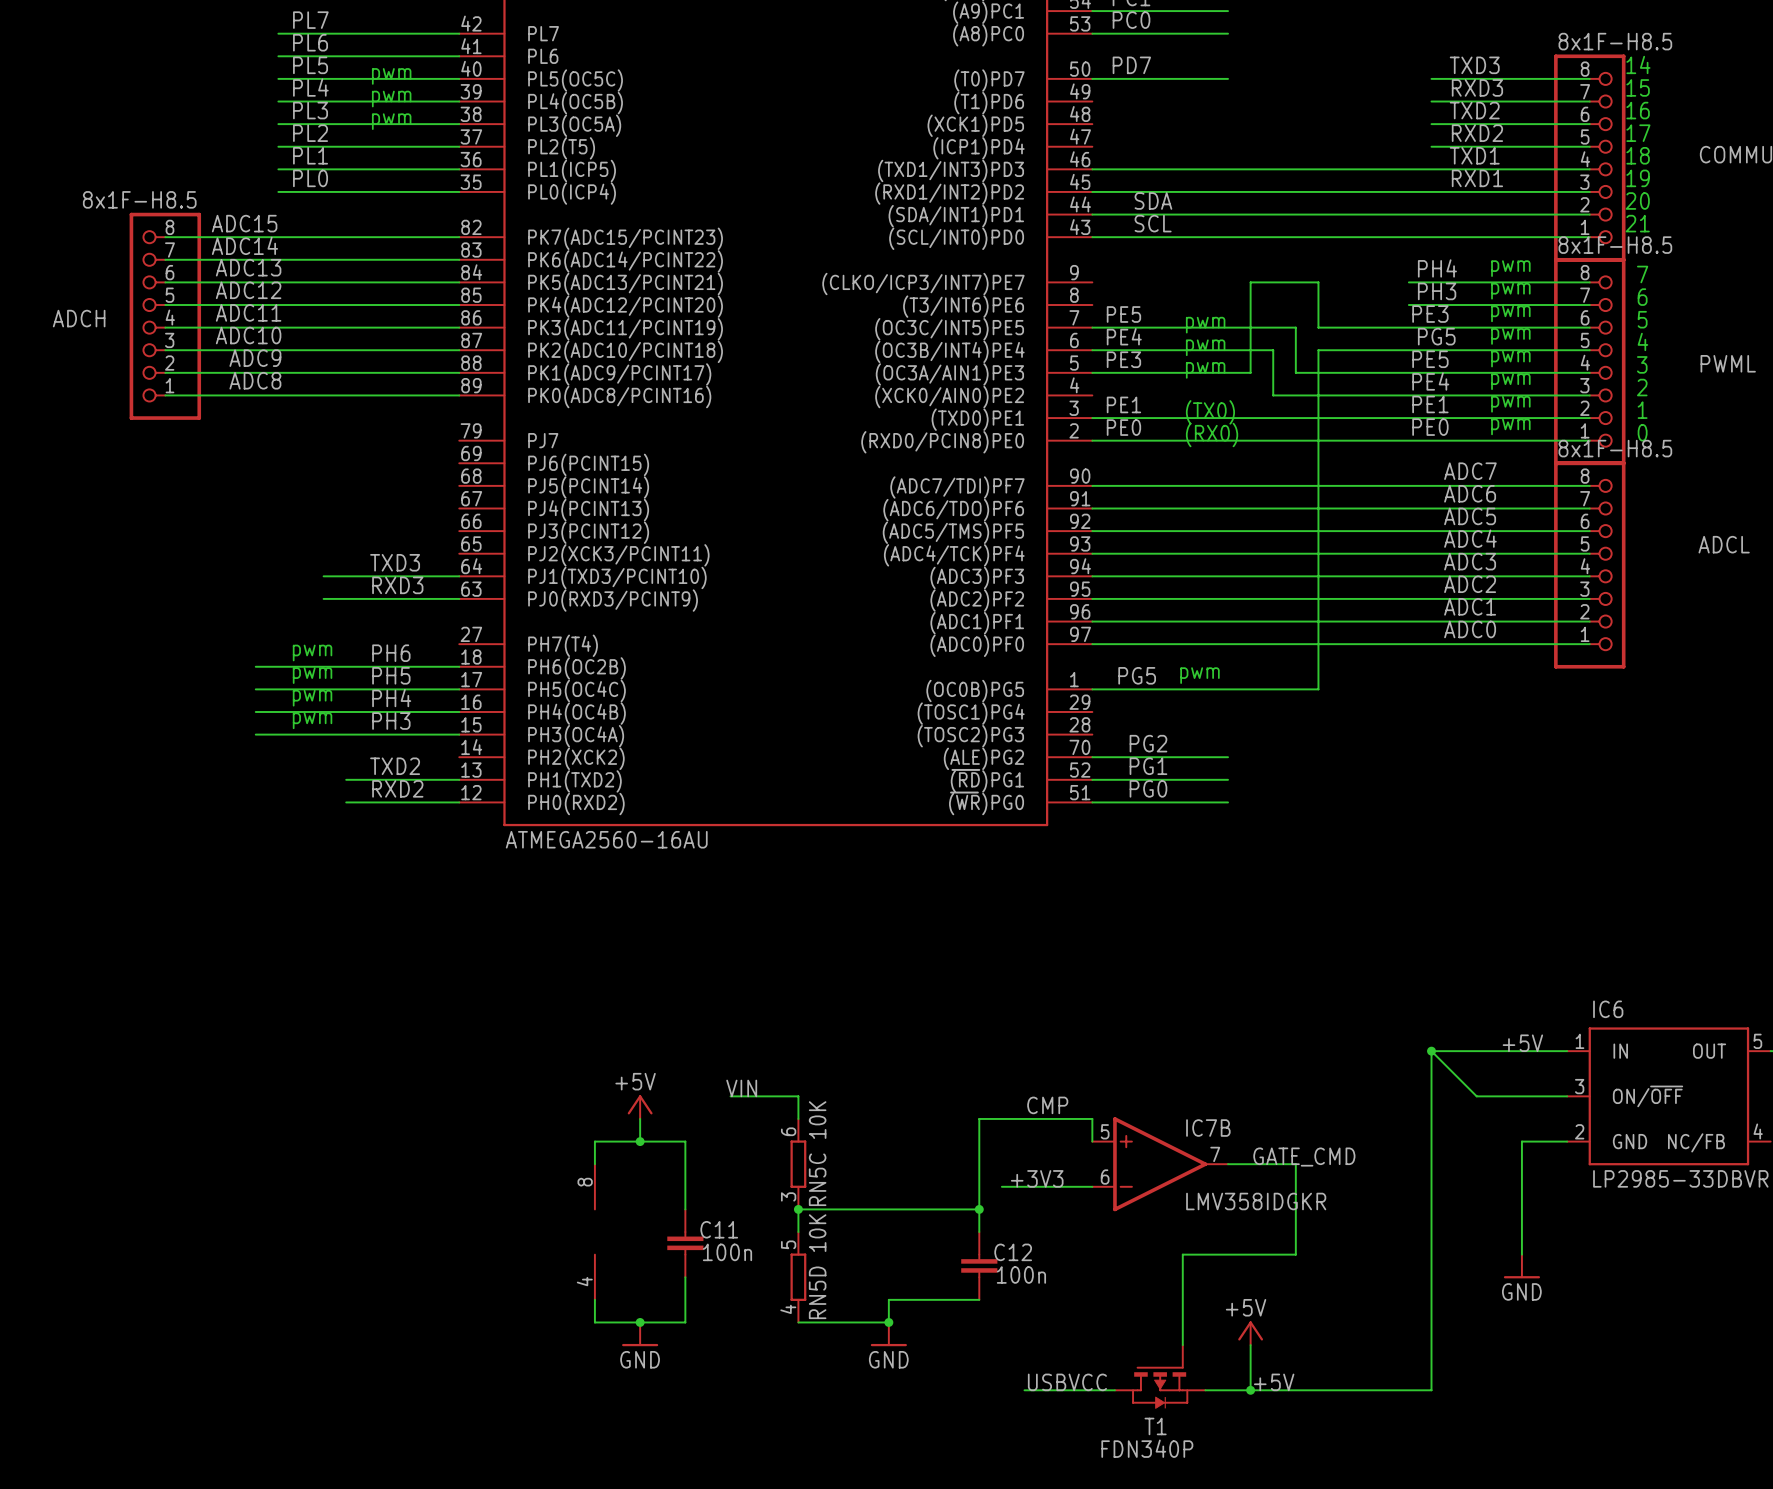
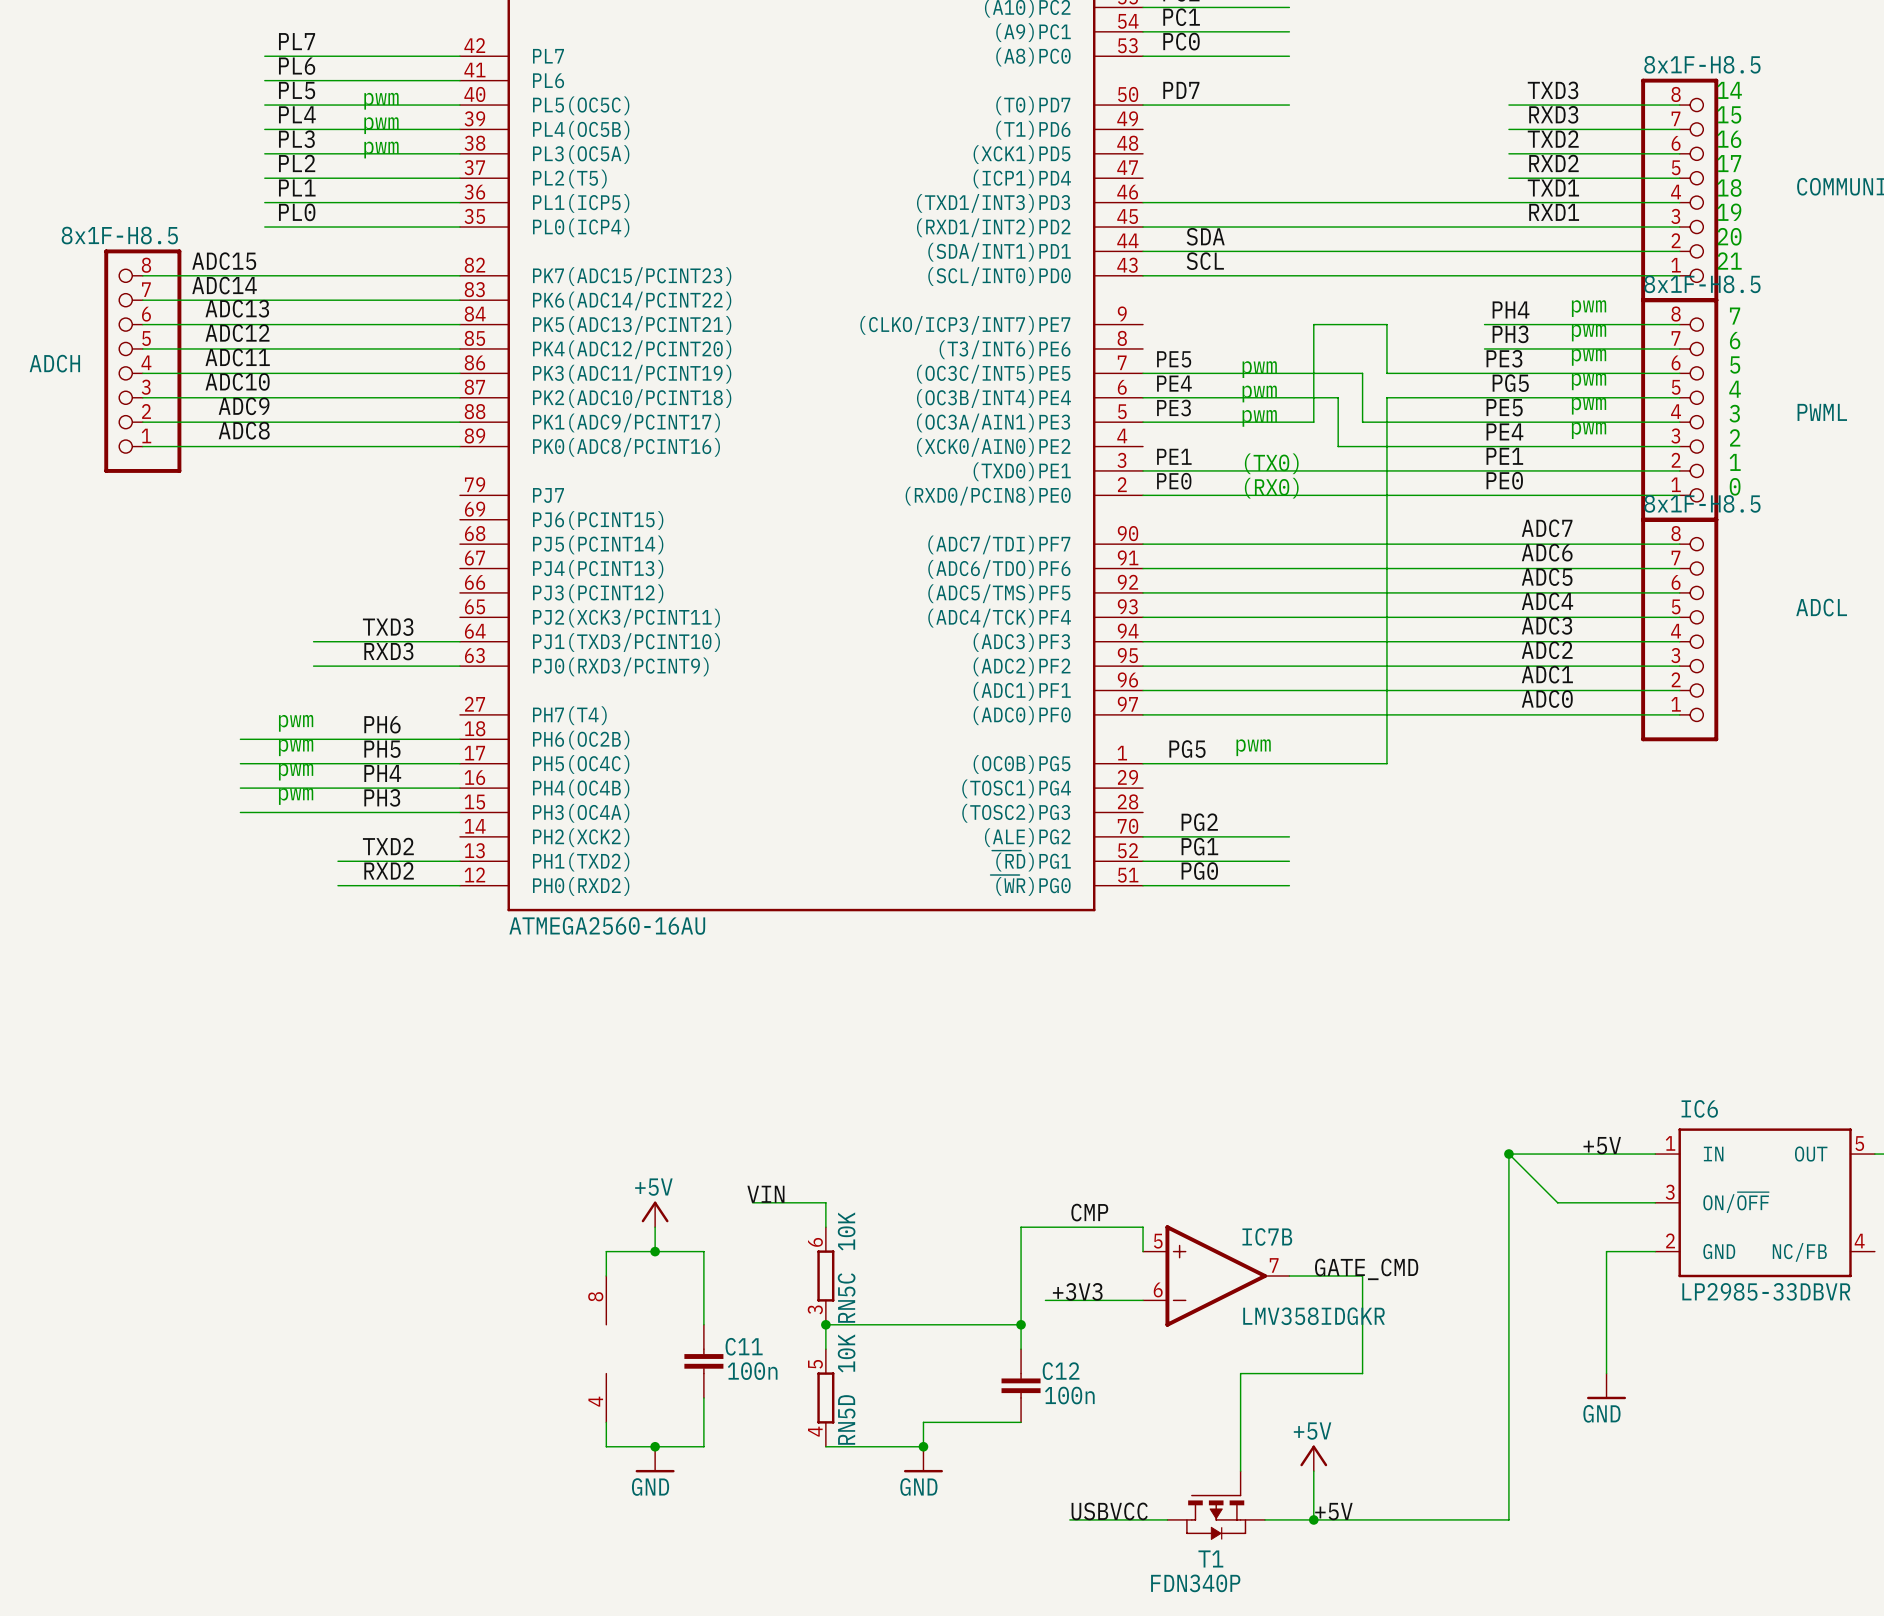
text: pwm (1510, 404) -> none
text: pwm (1510, 426) -> none

